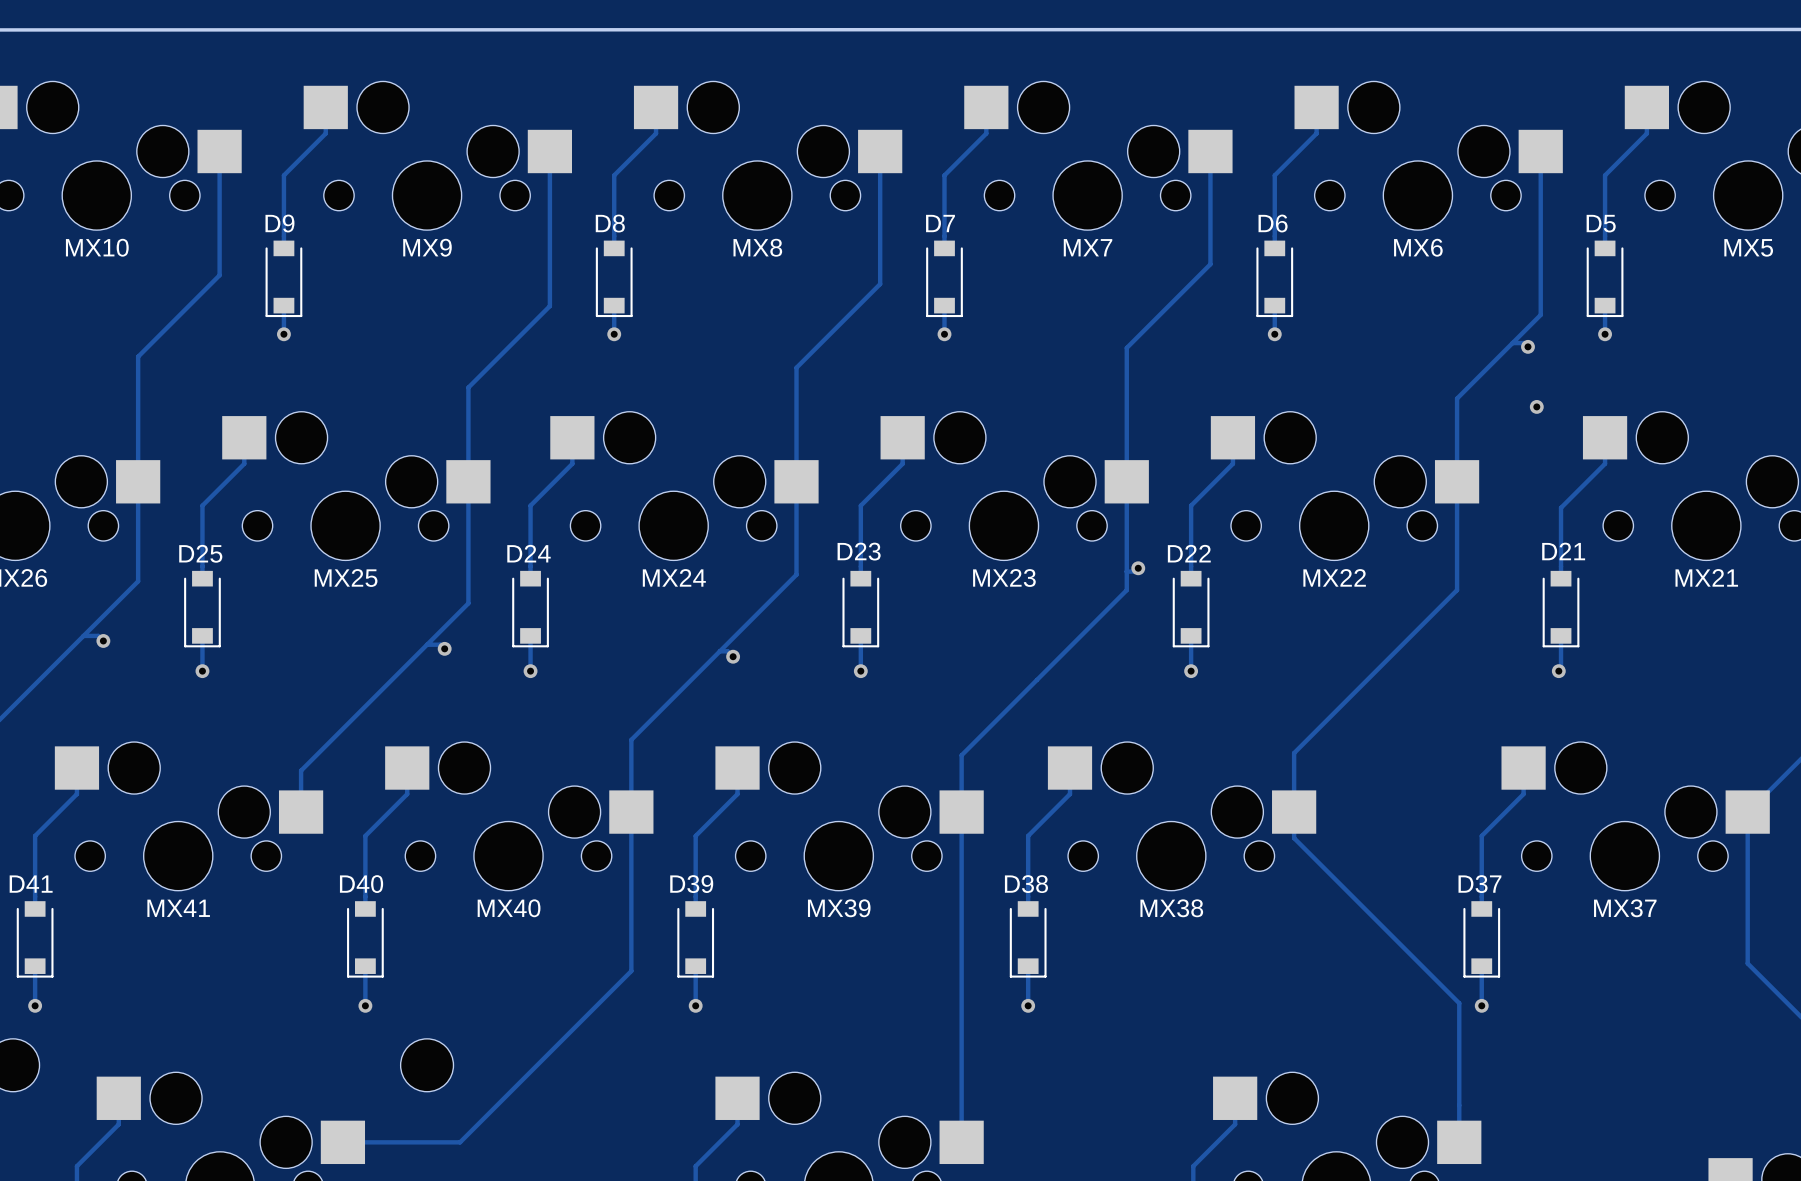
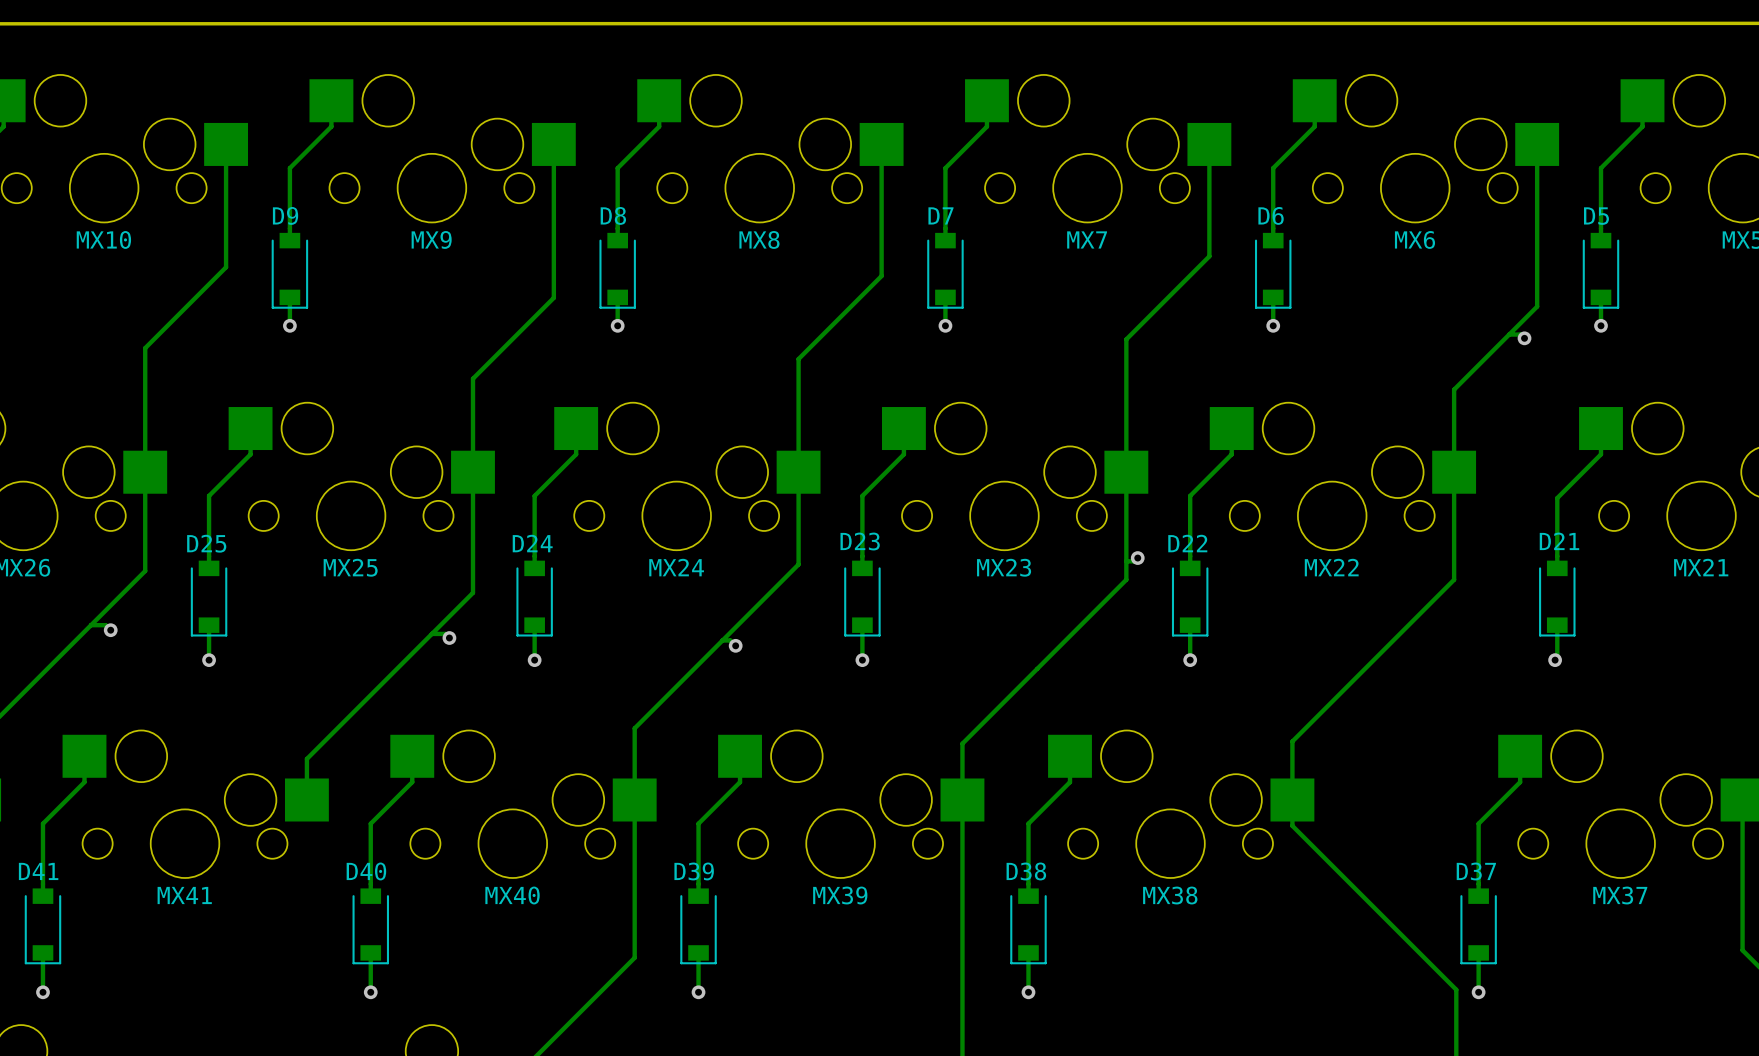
via: (1536, 406) -> none

